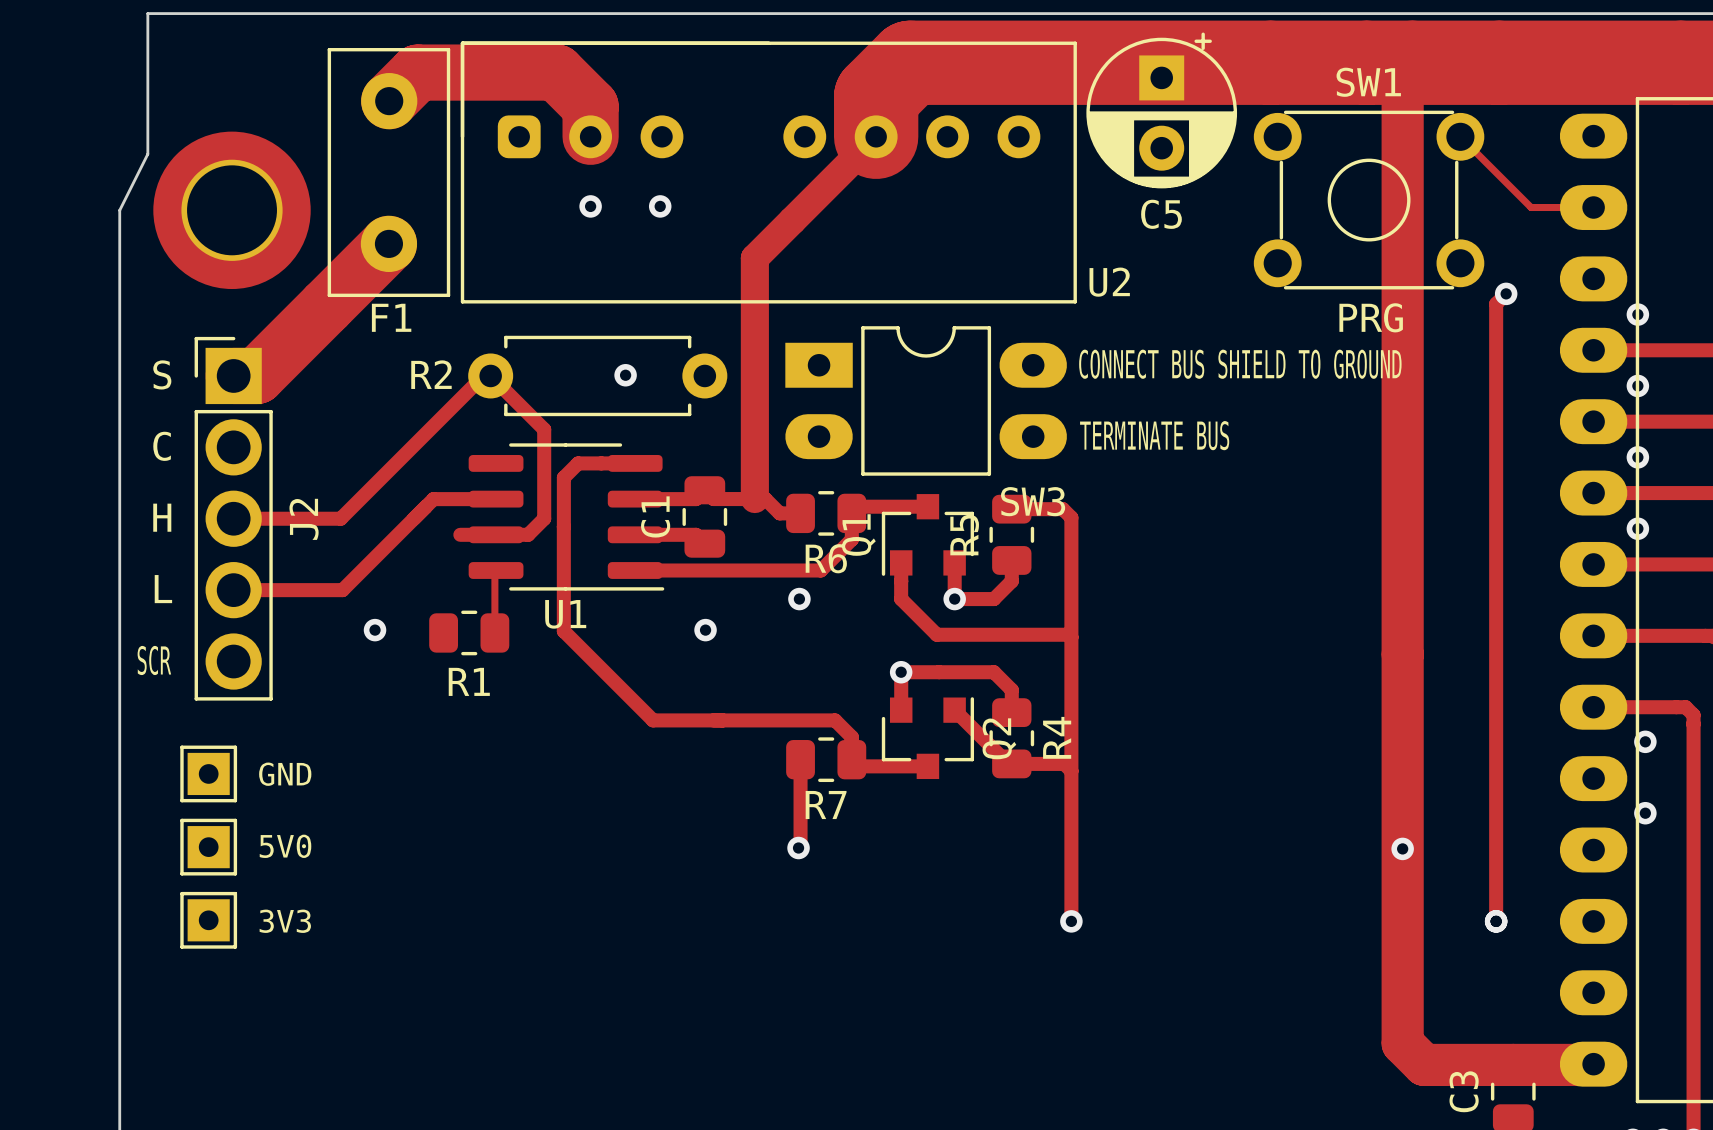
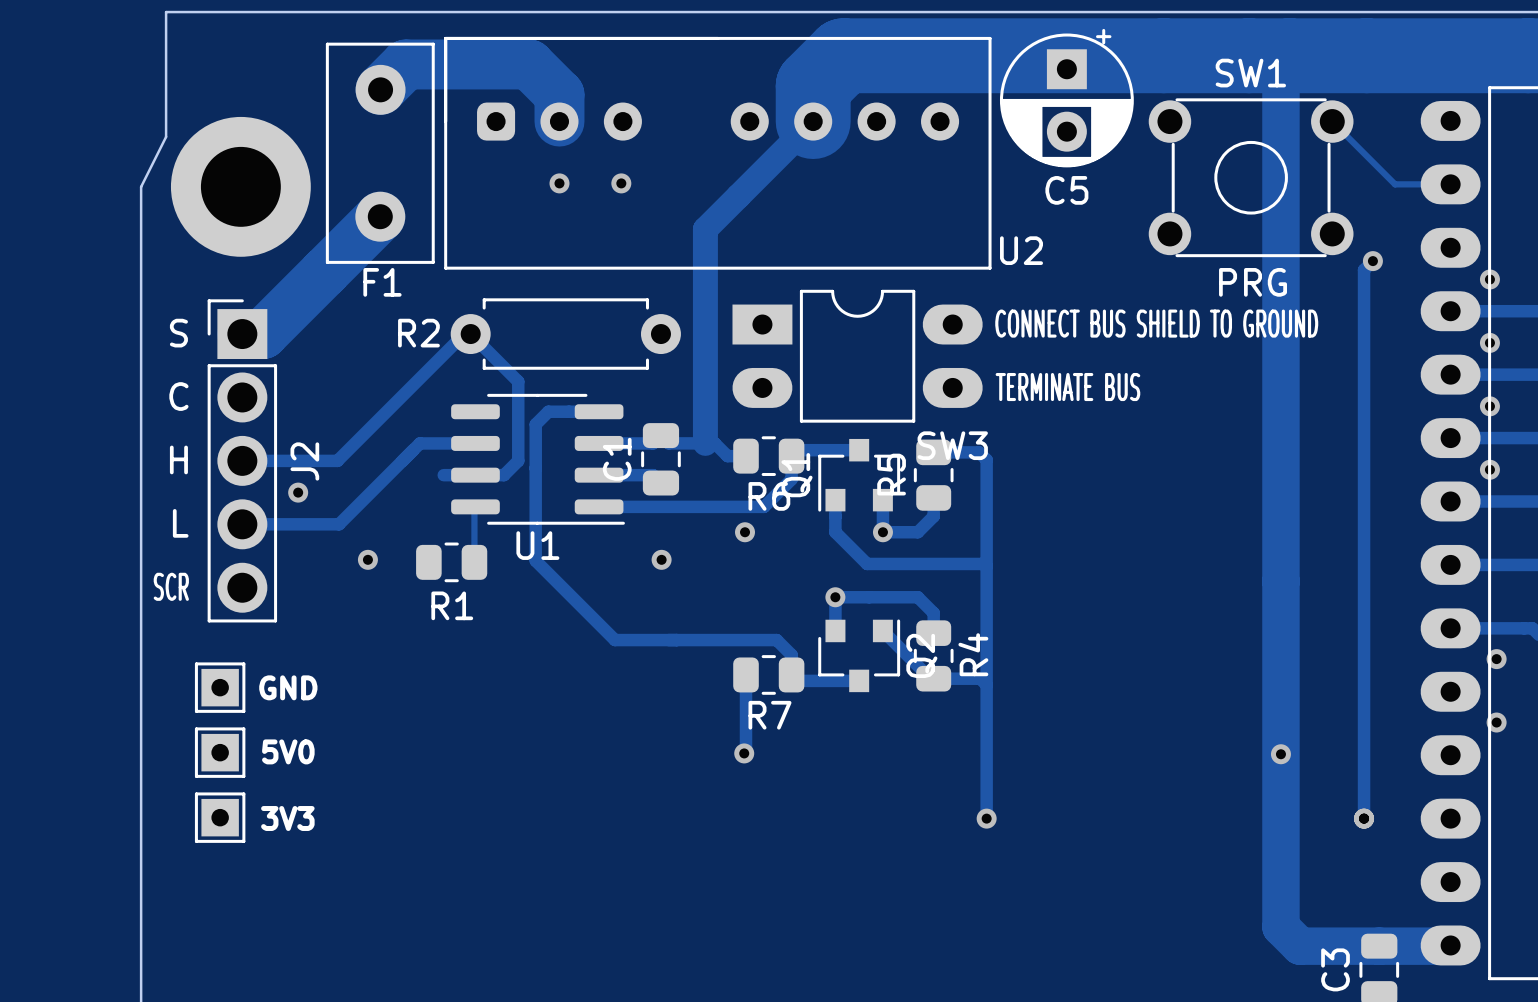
via: (625, 375) -> none
via: none -> (298, 492)

